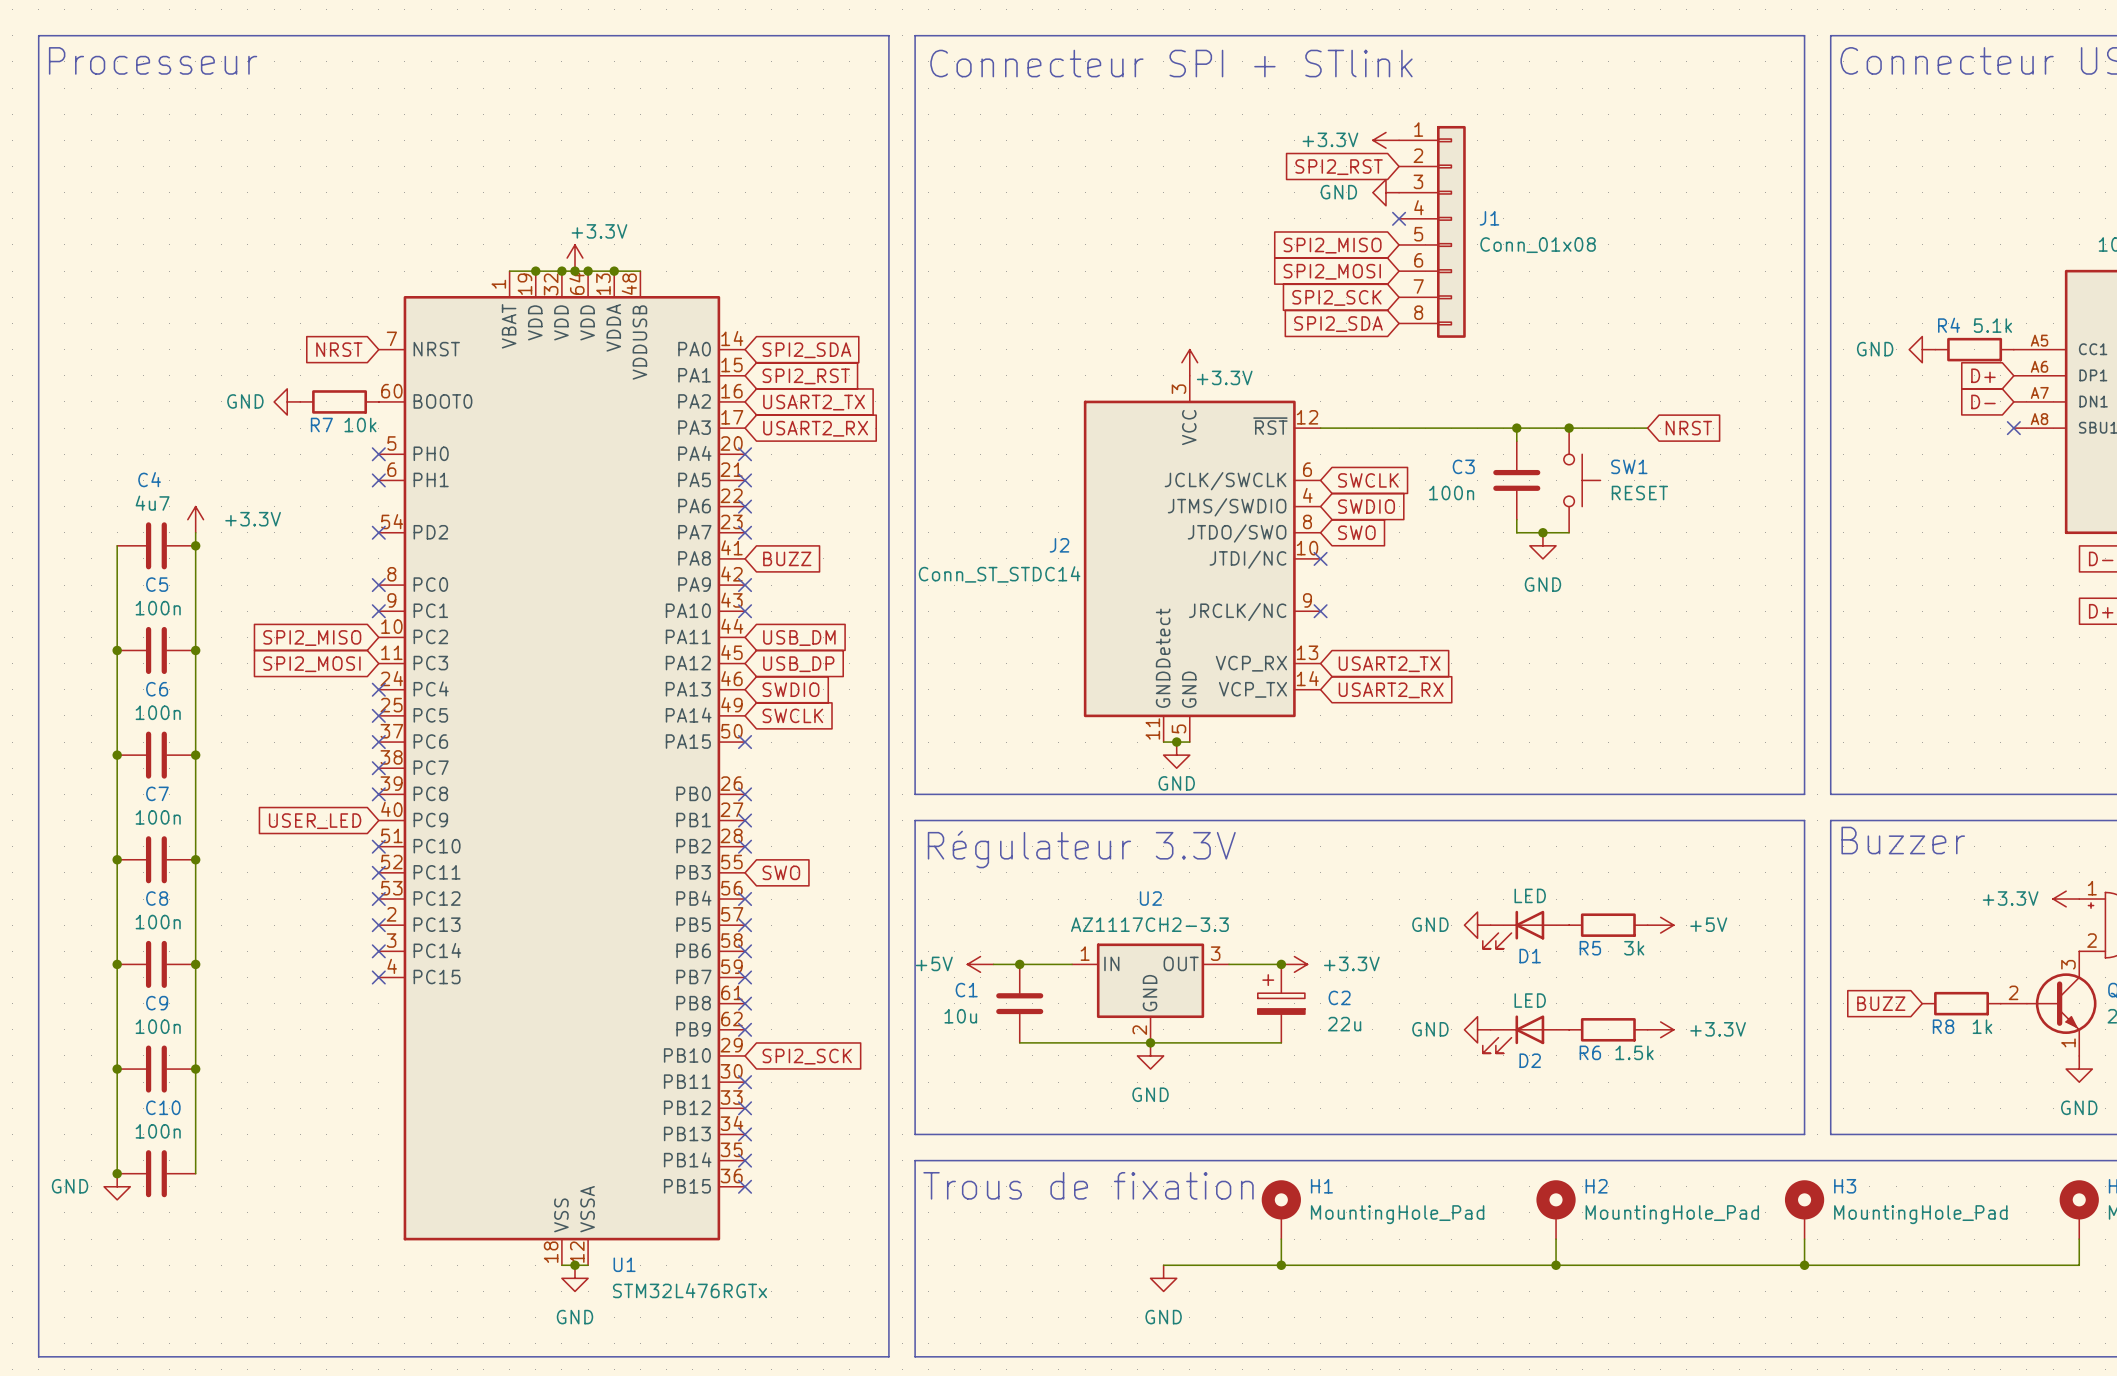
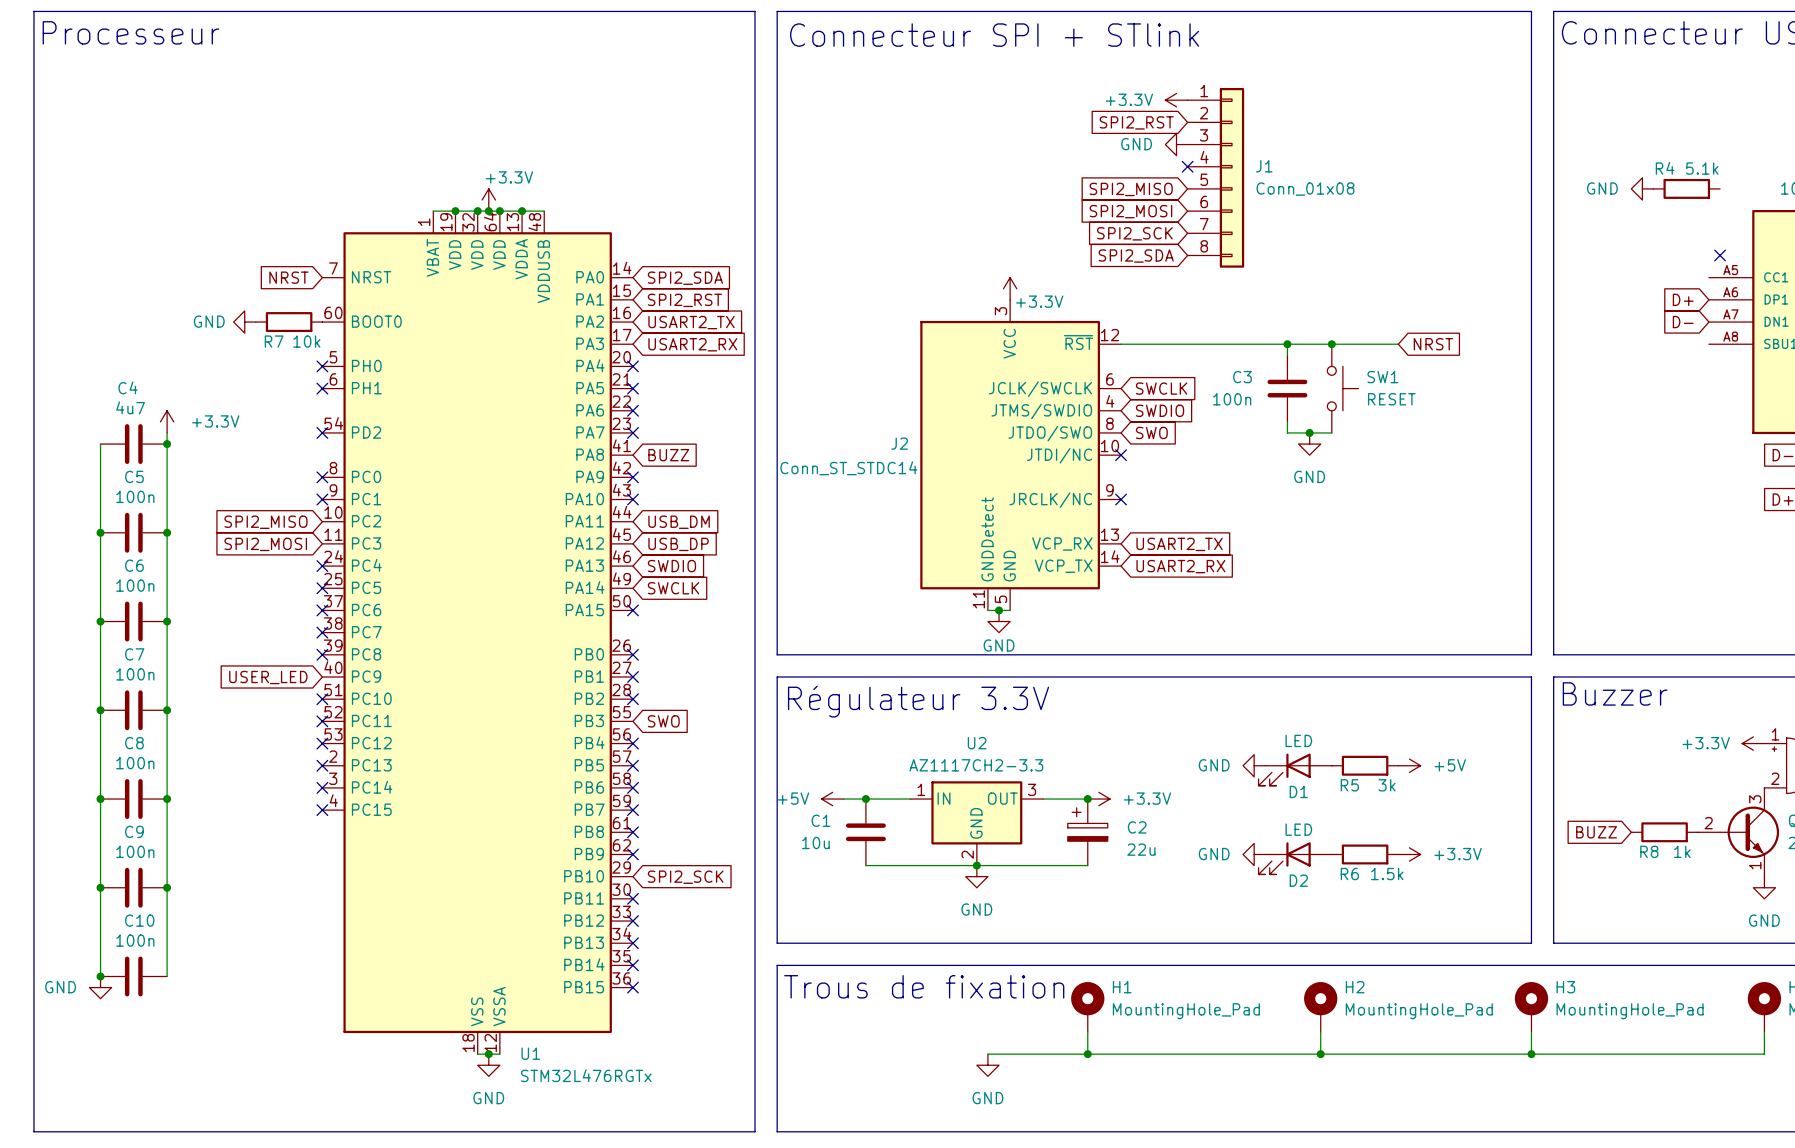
no-connect mark: none -> (1720, 255)
power symbol position: GND (1922, 349) -> GND (1642, 188)
R4 position: (1974, 349) -> (1686, 188)
no-connect mark: (2013, 428) -> none

